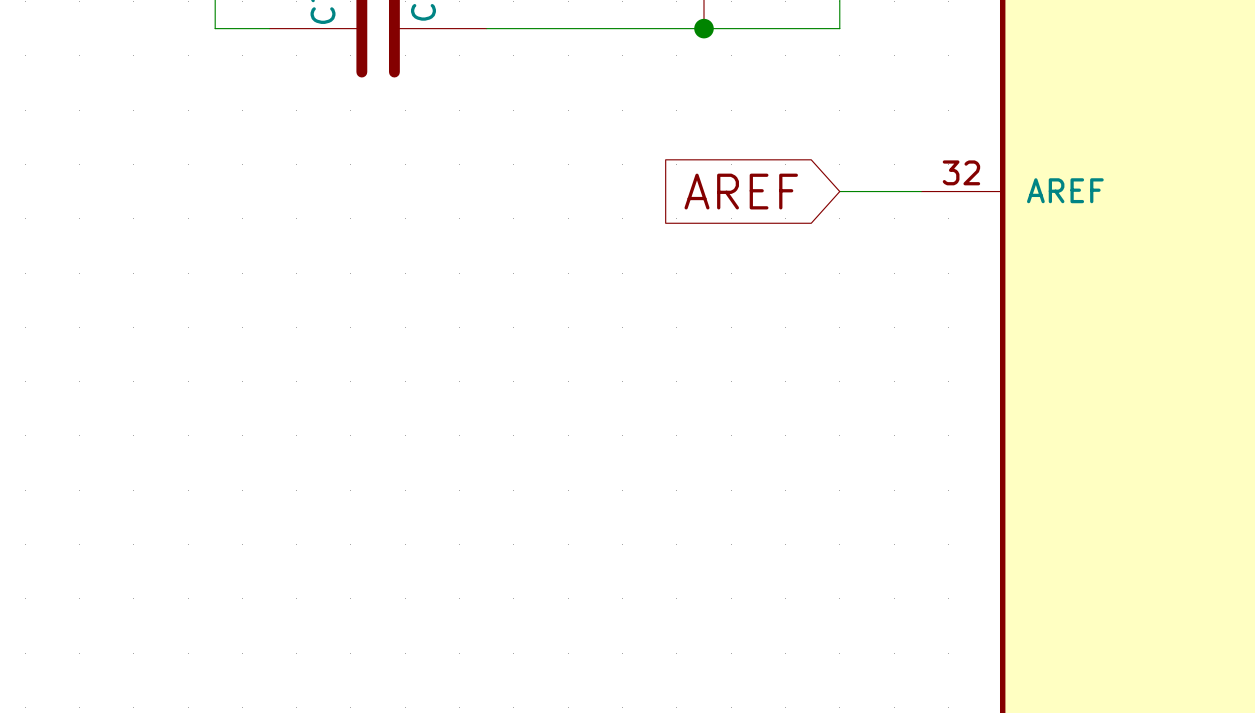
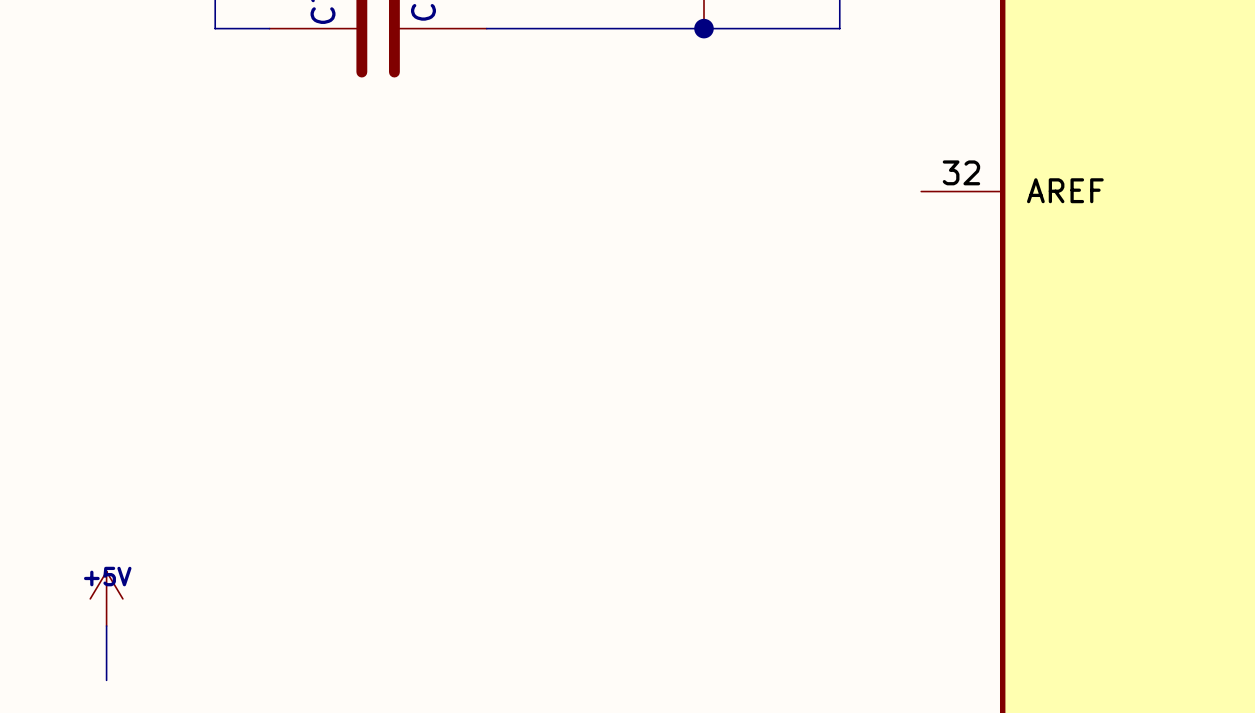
global label: AREF (741, 191) -> none
wire: (839, 191) (921, 191) -> none
power symbol: none -> +5V (106, 598)
wire: none -> (106, 626) (106, 680)

